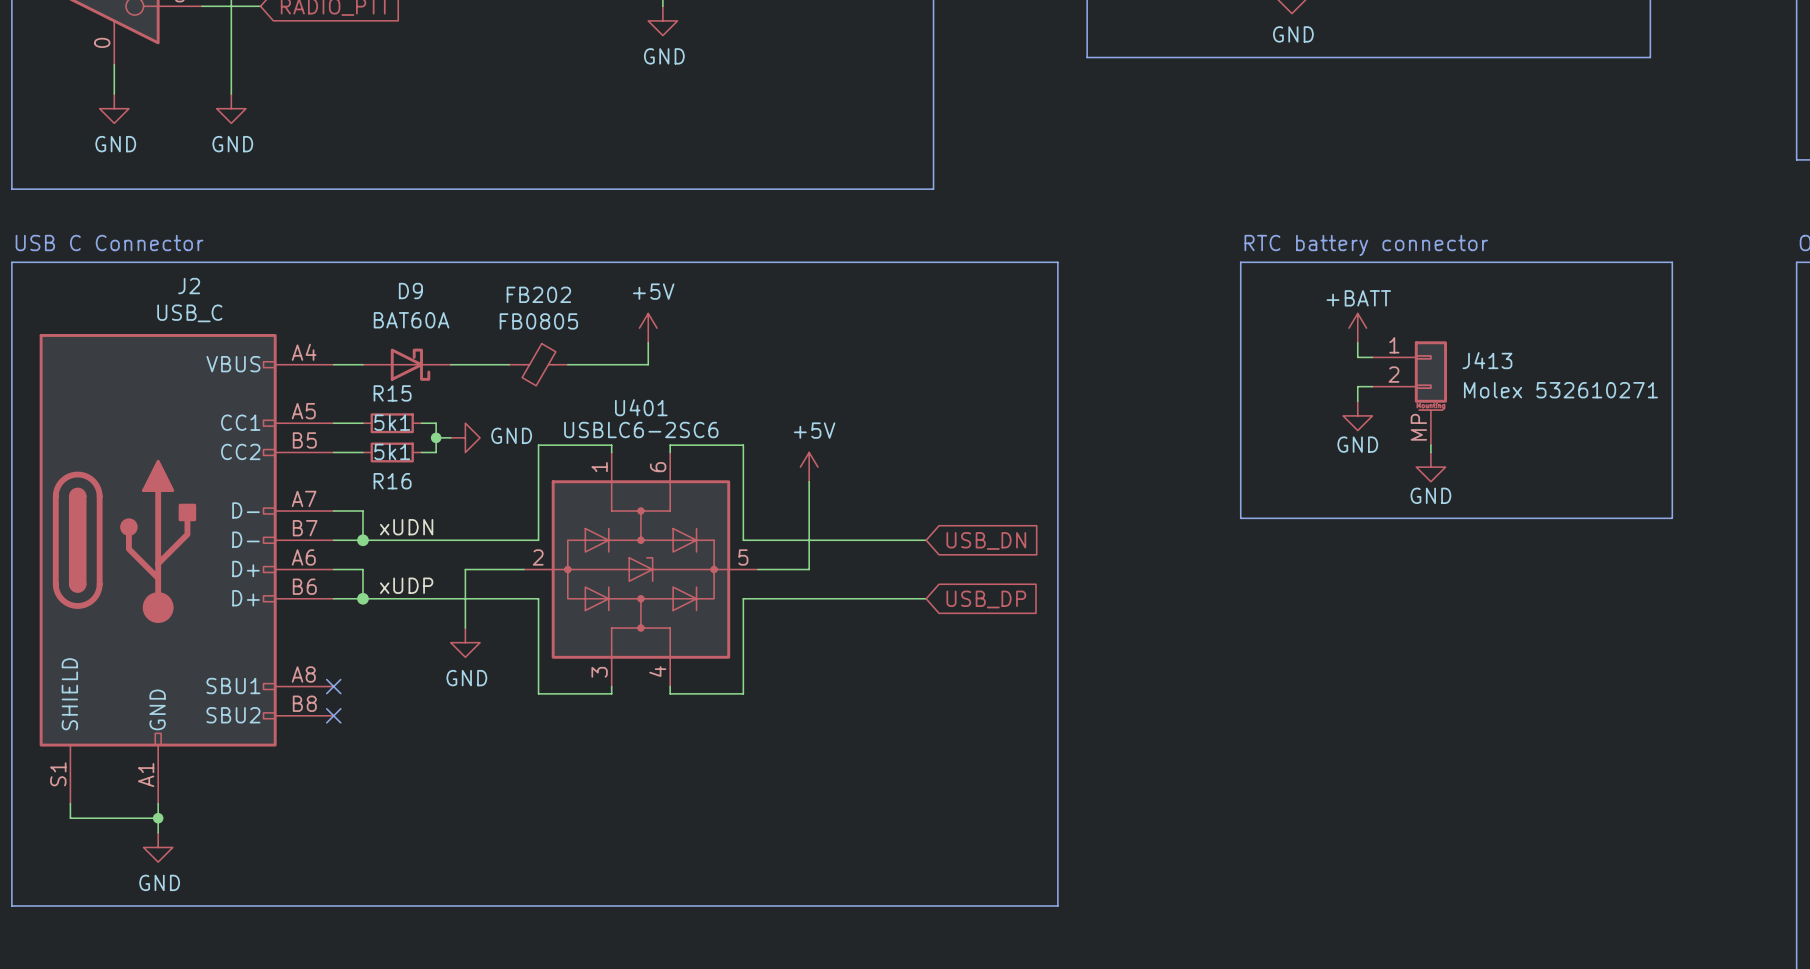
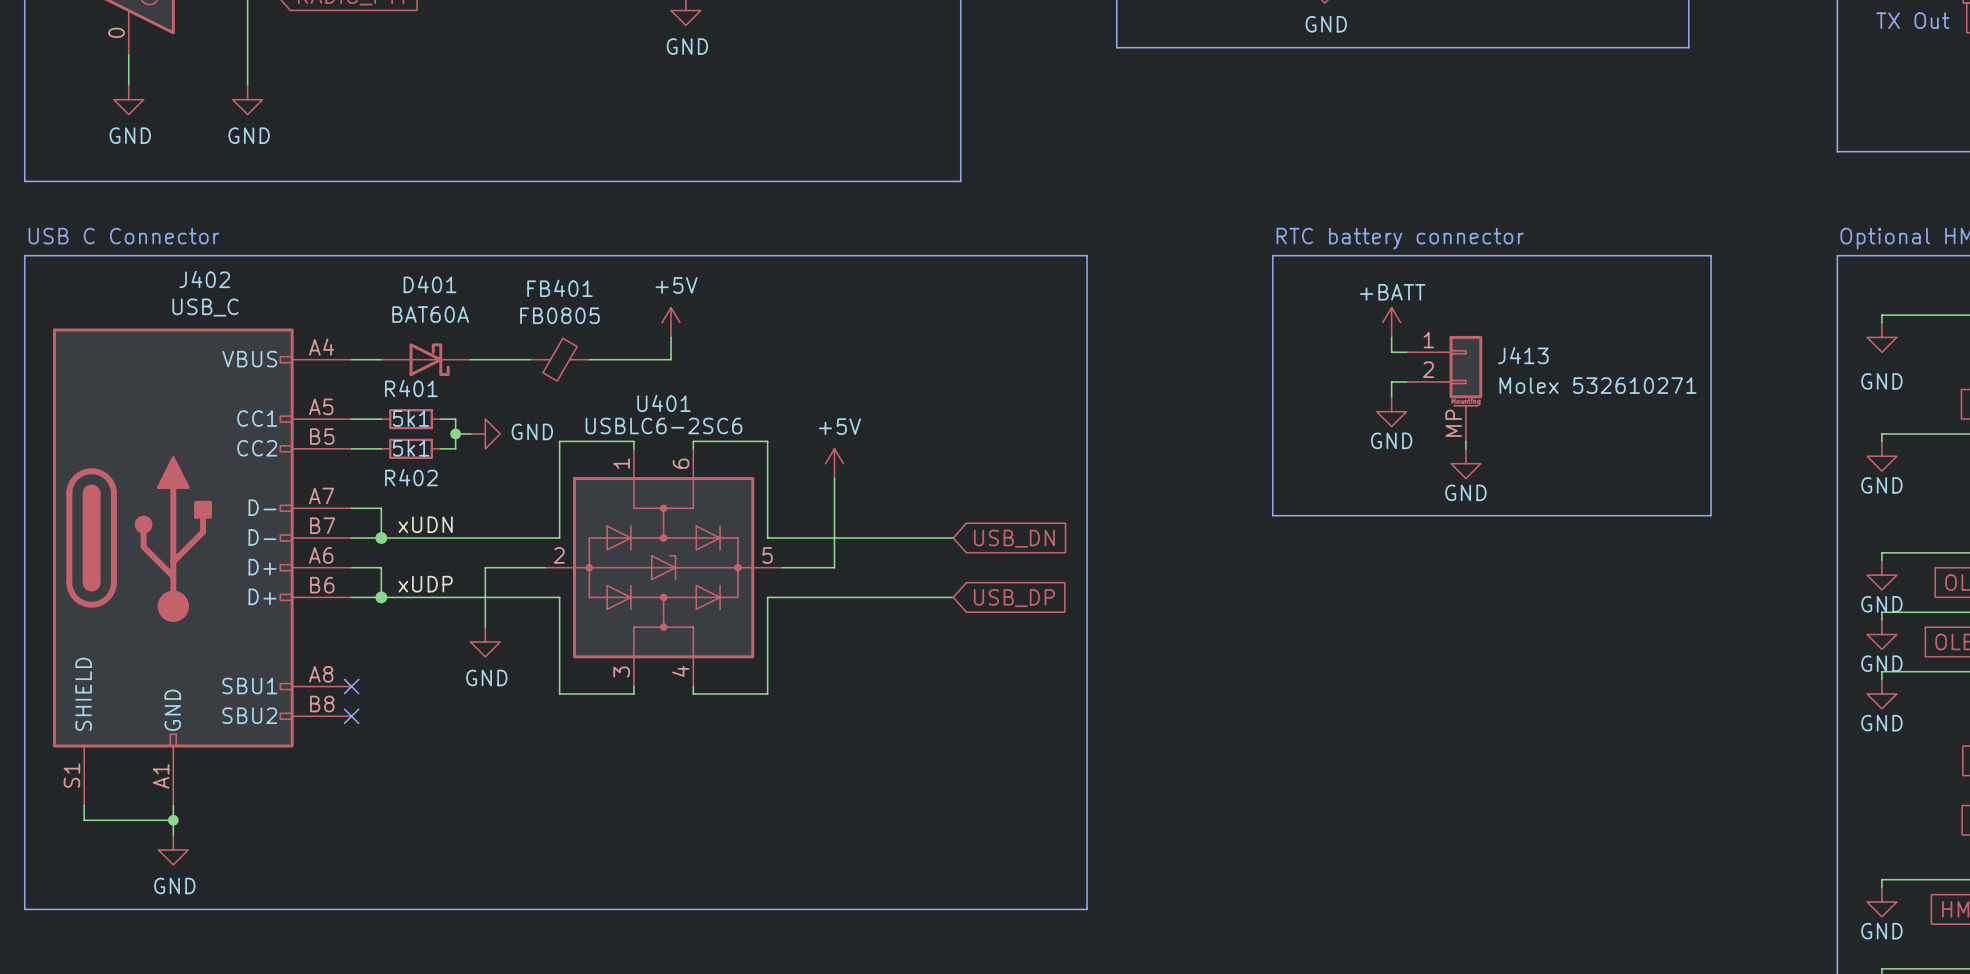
J2 name: J2 (189, 286) -> J402 (204, 279)
D9 name: D9 (410, 291) -> D401 (429, 284)
FB202 name: FB202 (538, 294) -> FB401 (559, 288)
R15 name: R15 (392, 393) -> R401 (411, 388)
R16 name: R16 (392, 481) -> R402 (411, 477)

